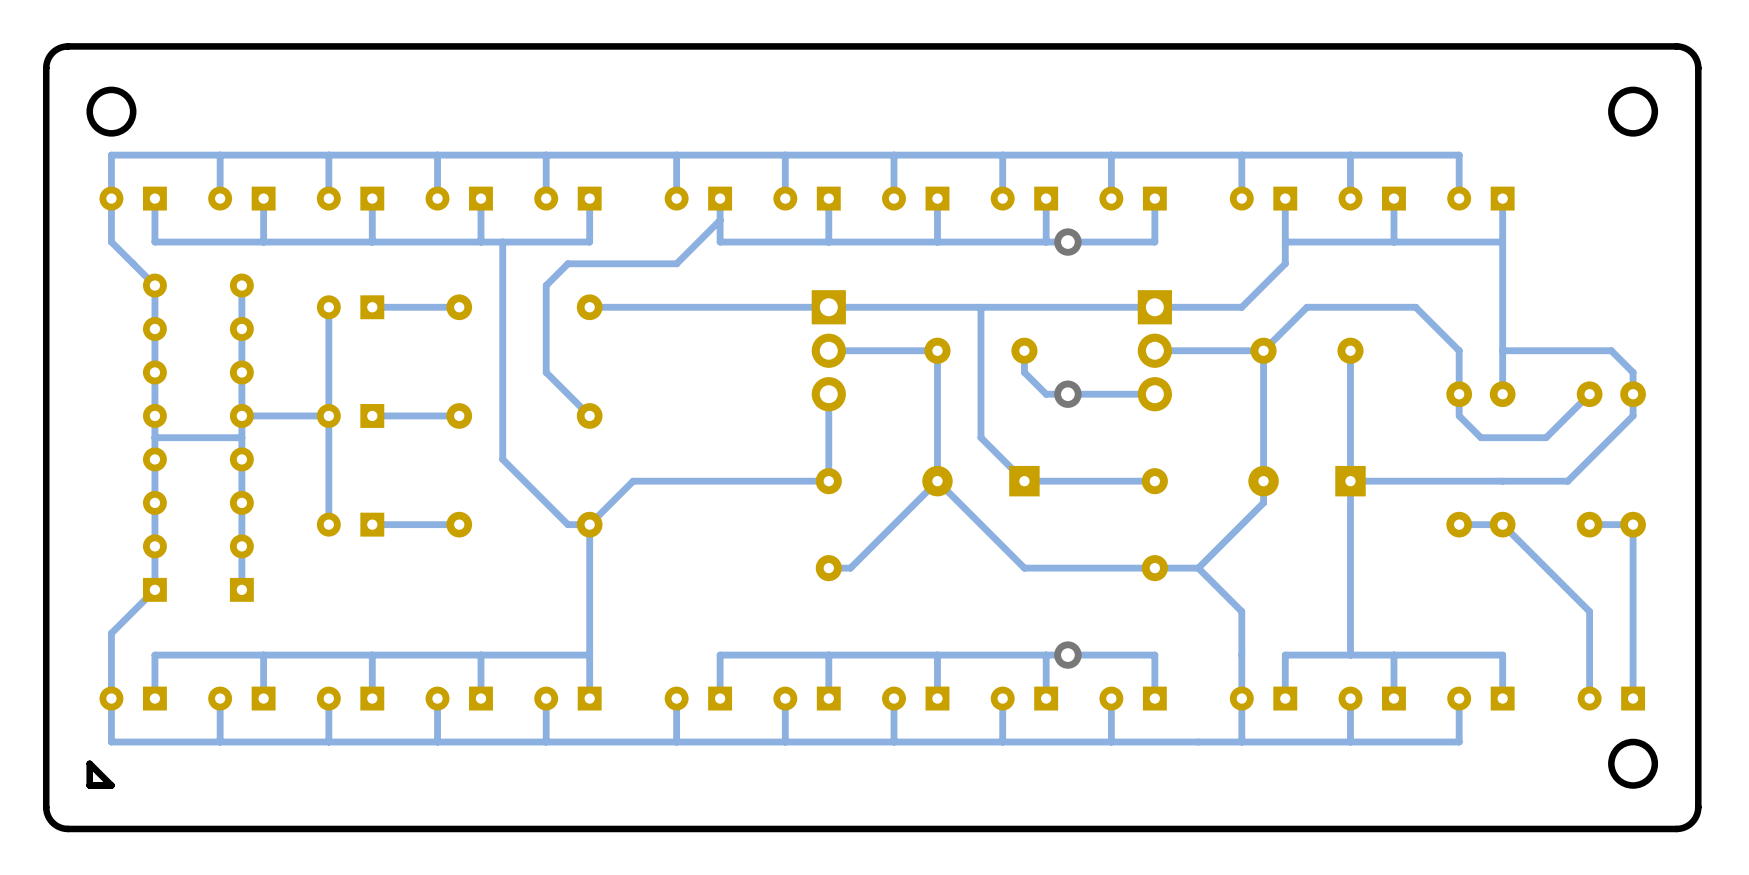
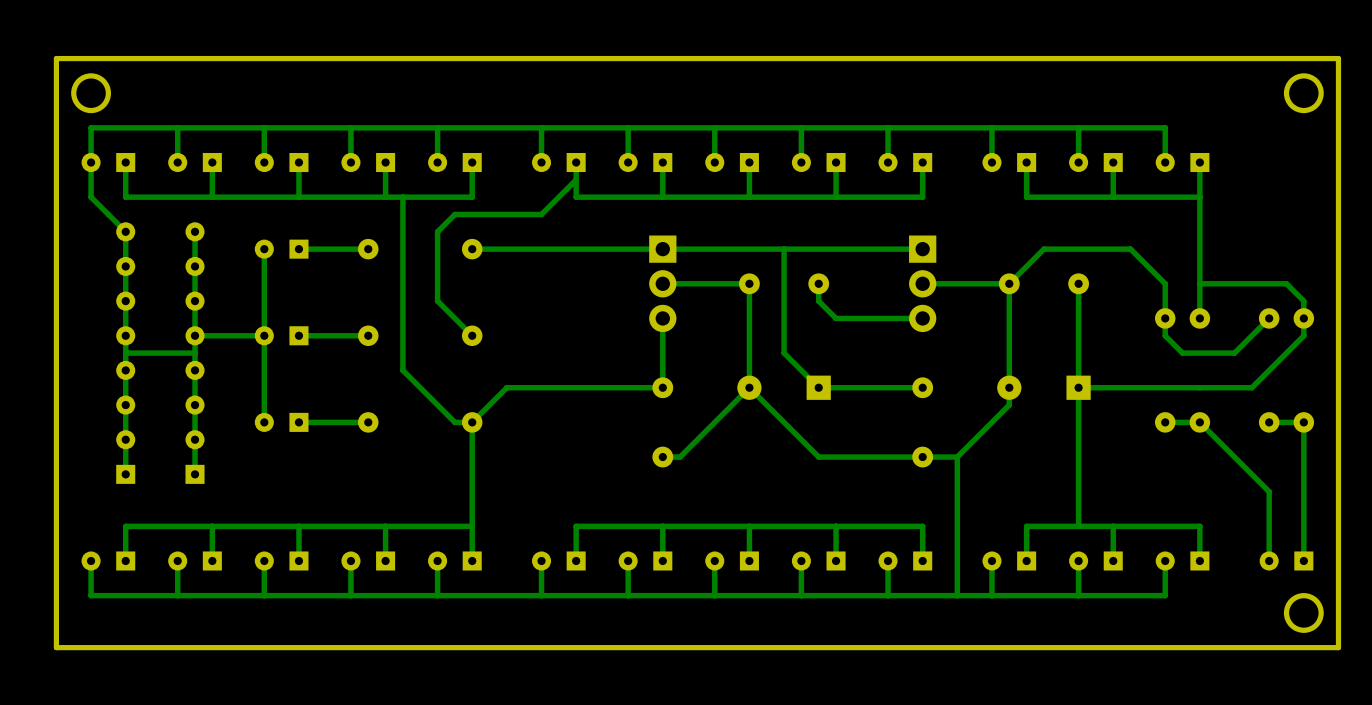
board edge: (1676, 46) (67, 46) (59, 48) (49, 57) (46, 68) (46, 807) (47, 815) (57, 826) (67, 828) (1676, 828) (1684, 827) (1695, 818) (1698, 807) (1698, 68) (1696, 59) (1691, 52) (1684, 48) (1676, 46) -> (1338, 58) (1338, 647) (56, 647) (56, 58) (1338, 58)
via: (1067, 242) -> none
track: (1285, 242) (1285, 263) (1241, 307) (1154, 307) -> none
via: (1067, 394) -> none
track: (1198, 568) (1241, 611) (1241, 698) -> (957, 457) (957, 595)
track: (154, 589) (111, 633) (111, 698) -> none
via: (1067, 655) -> none
board edge: (89, 763) (111, 785) (89, 785) (89, 763) -> none

